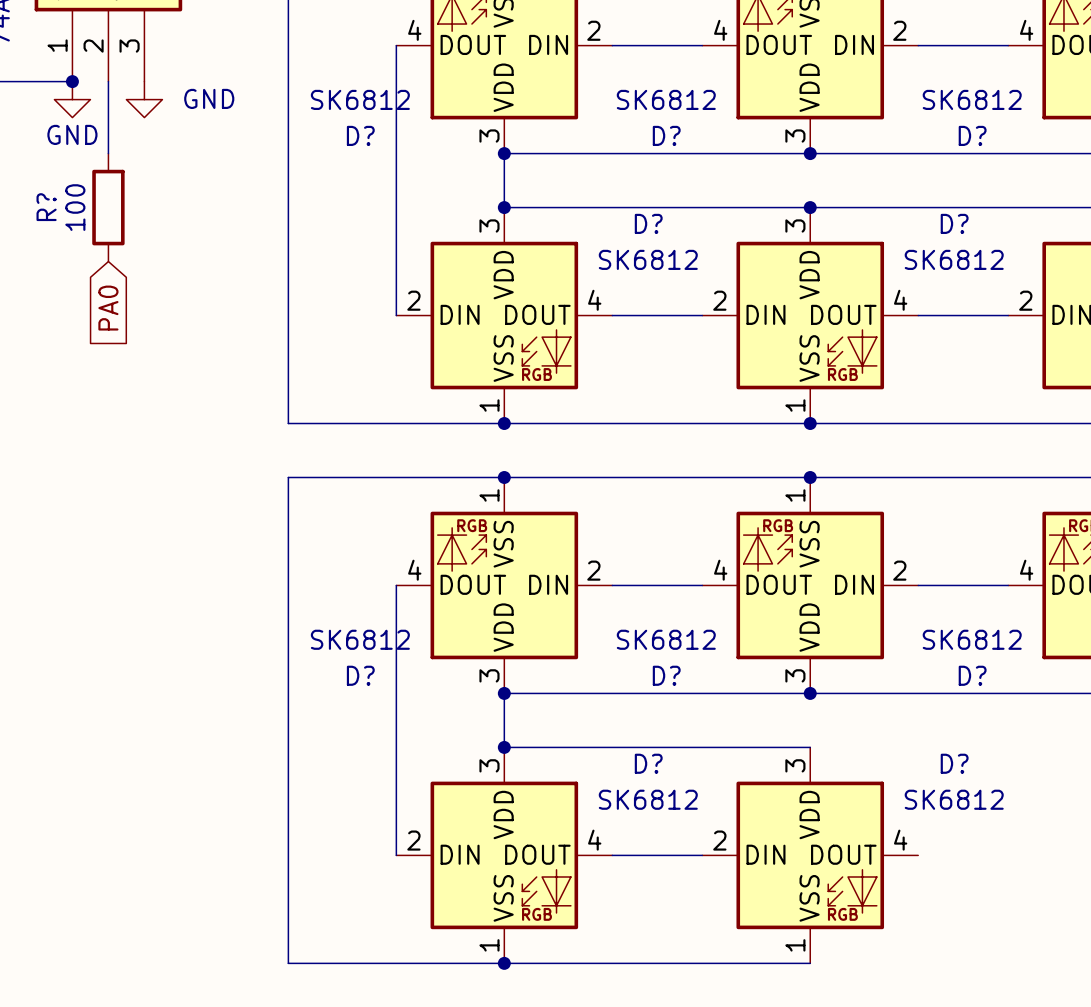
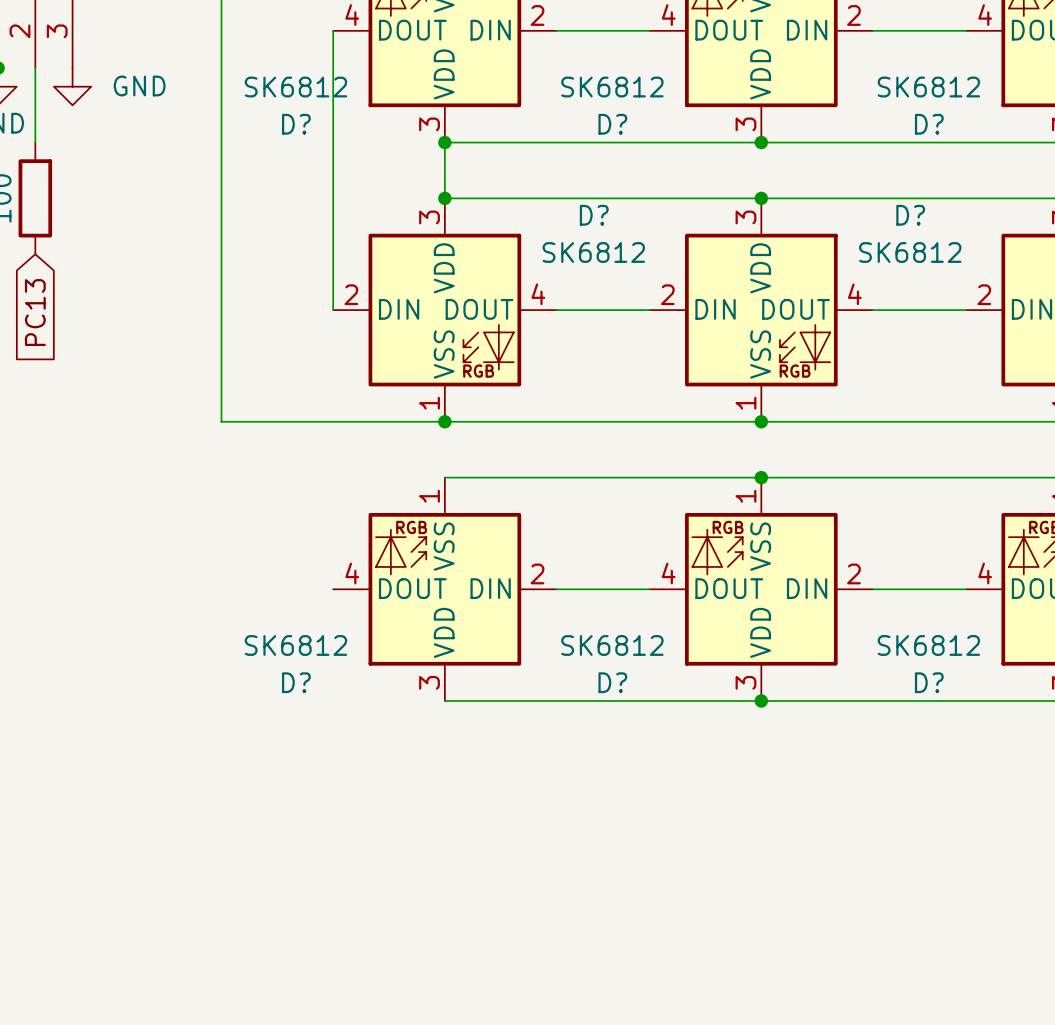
global label: PA0 (108, 308) -> PC13 (35, 312)
wire: (504, 477) (288, 477) (288, 963) (810, 963) -> none
junction: (504, 477) -> none
wire: (396, 585) (396, 855) -> none
wire: (504, 693) (504, 747) (810, 747) -> none
junction: (504, 693) -> none
junction: (504, 747) -> none
D?: SK6812 (504, 855) -> none
wire: (612, 855) (702, 855) -> none
D?: SK6812 (810, 855) -> none
junction: (504, 963) -> none

